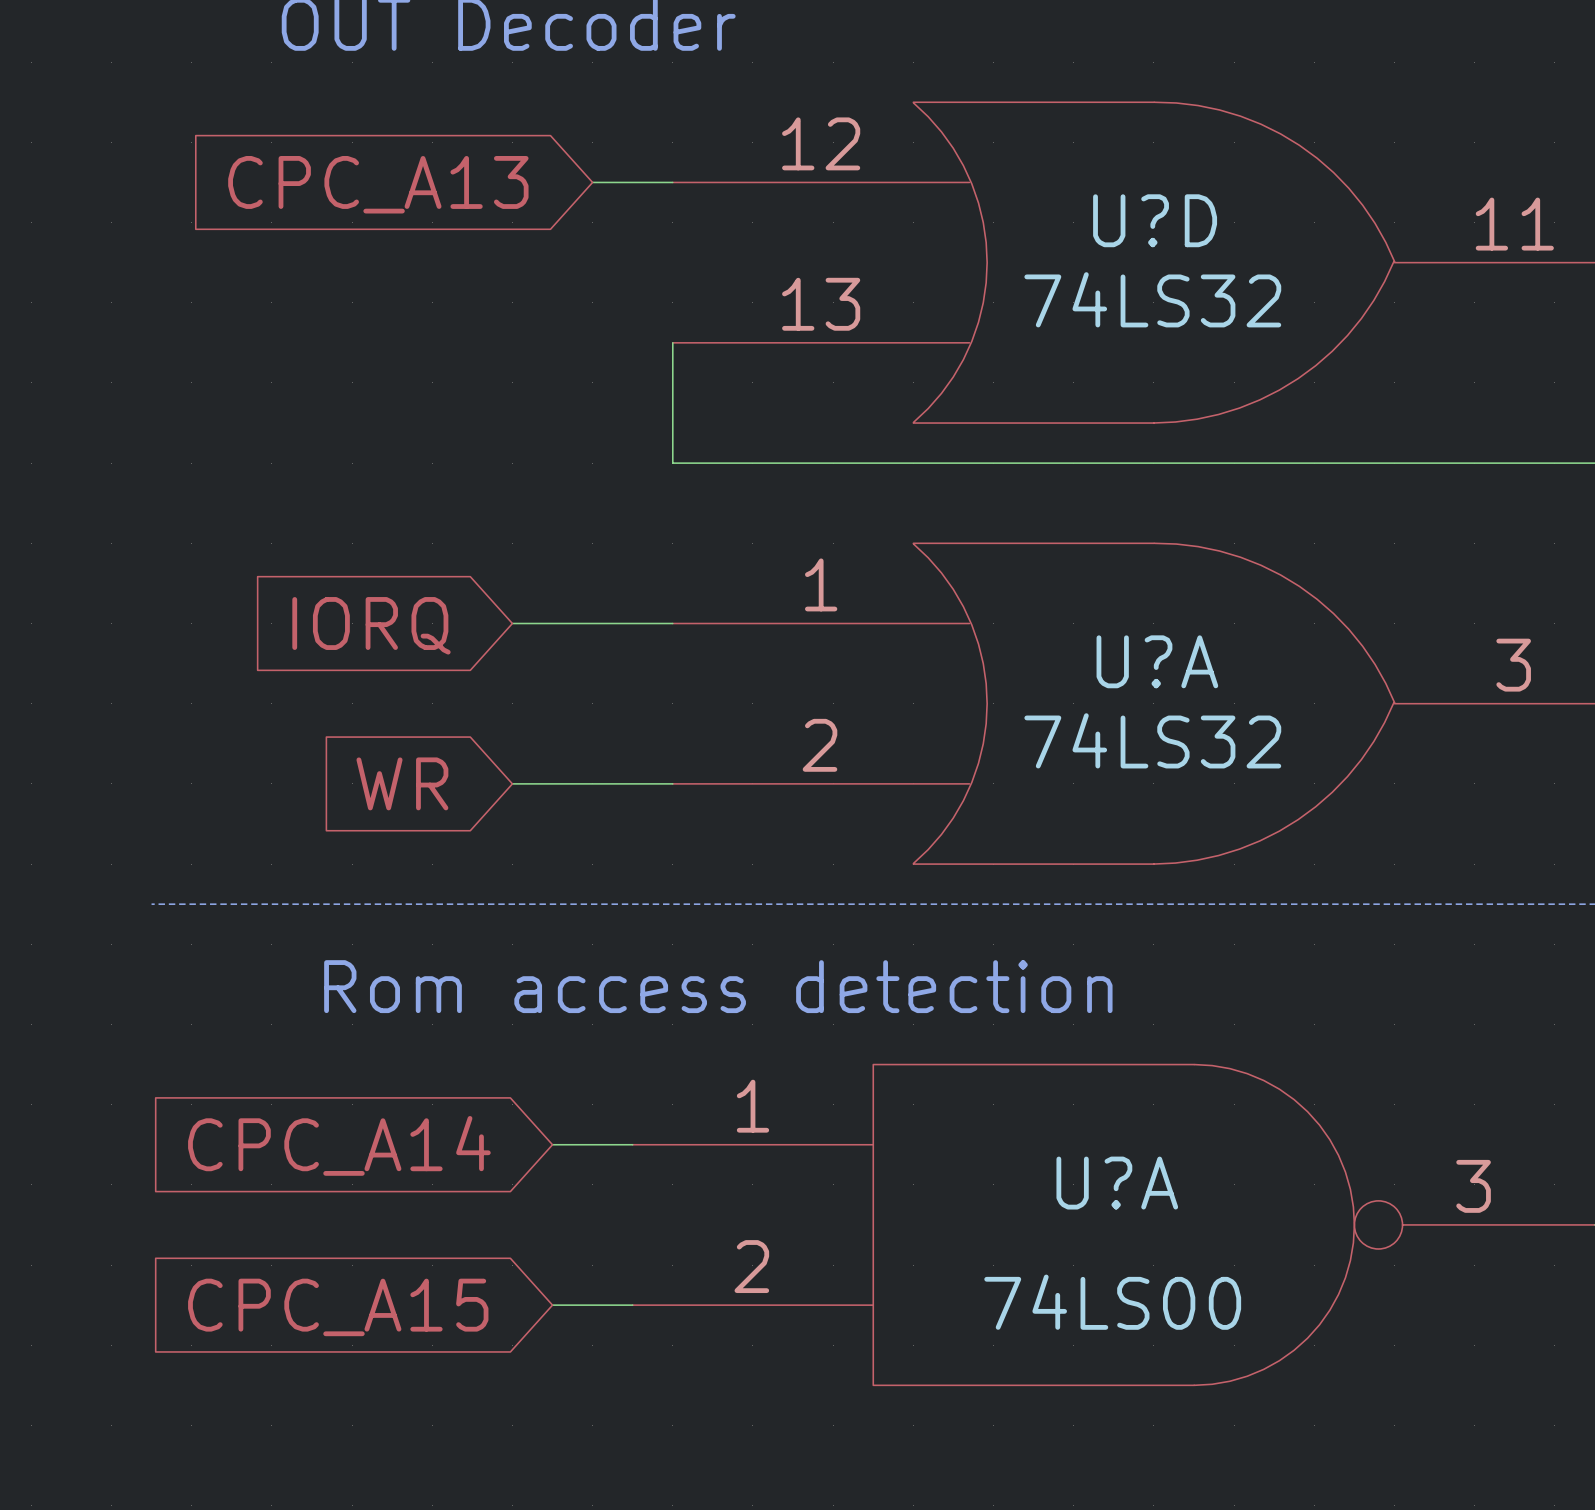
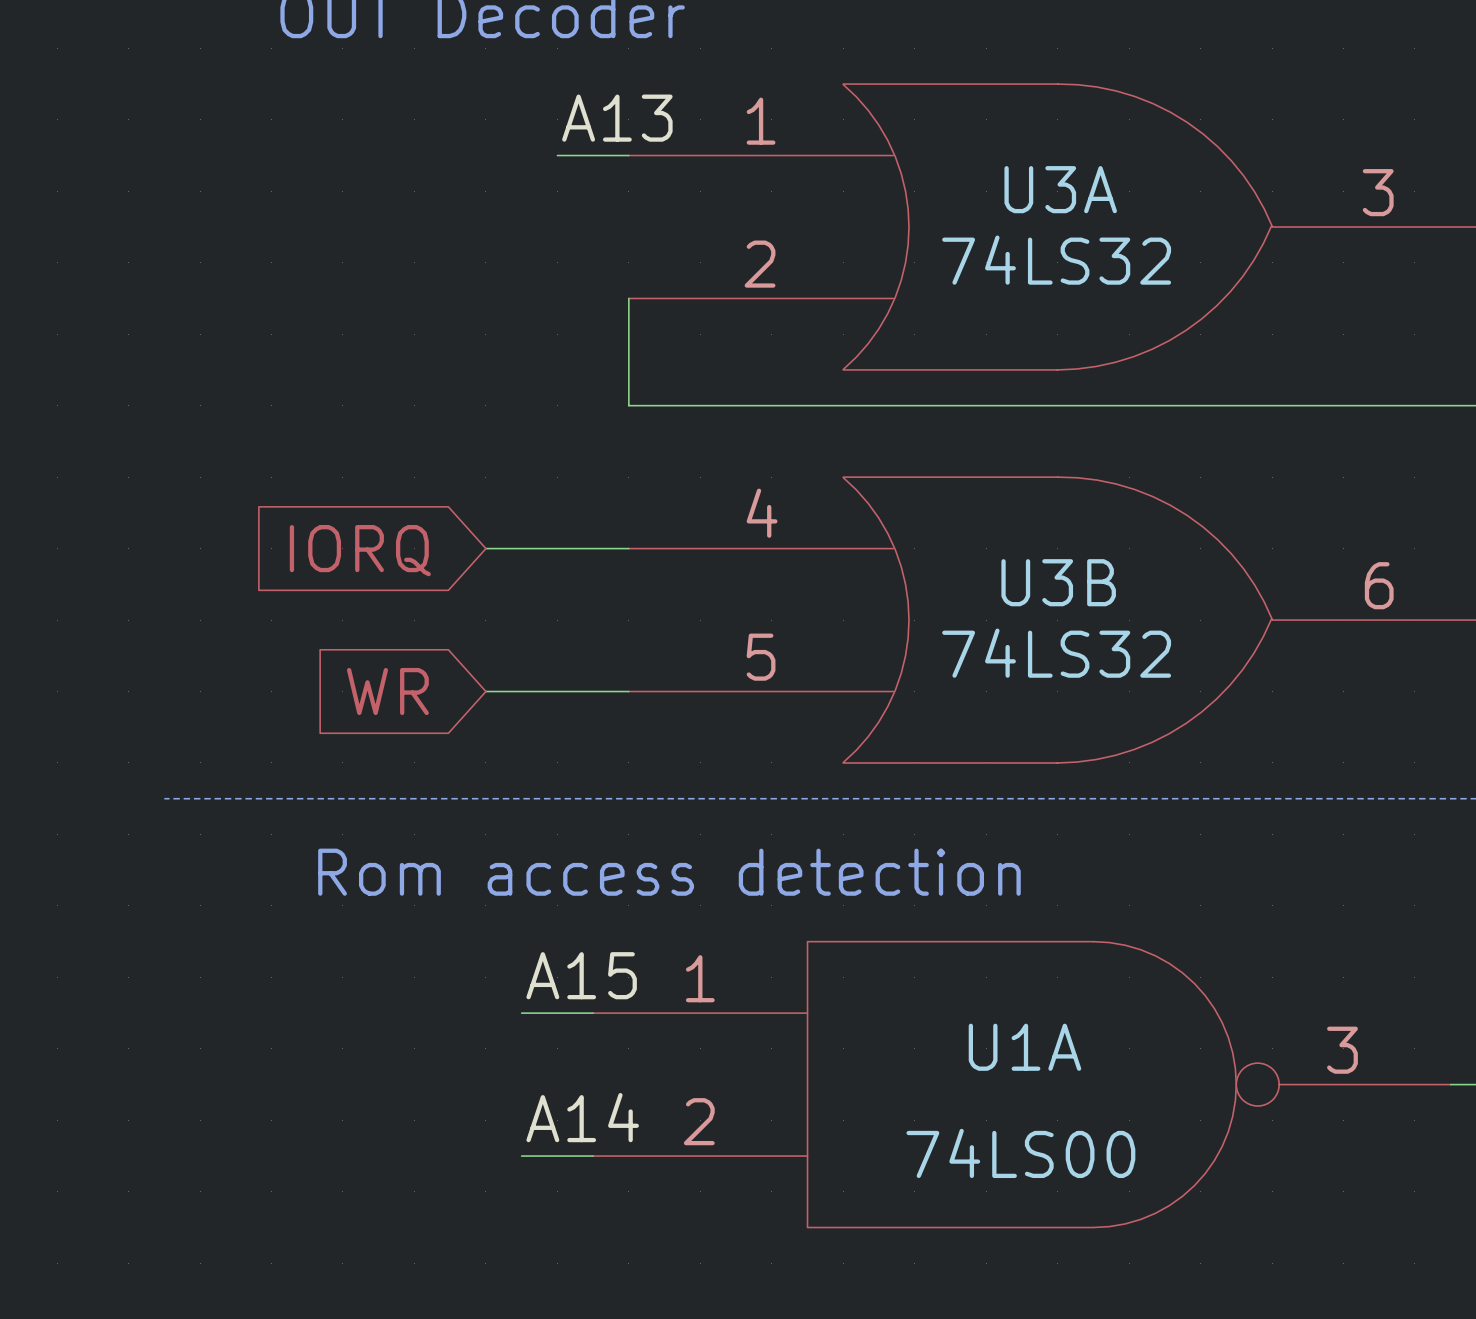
label: none -> A13 (617, 118)
U?D pin number: 12 (821, 143) -> 1 (761, 121)
global label: CPC_A13 (378, 184) -> none
U?D name: U?D (1155, 220) -> U3A (1060, 189)
U?D pin number: 11 (1514, 224) -> 3 (1378, 192)
U?D pin number: 13 (821, 304) -> 2 (760, 264)
U?A pin number: 1 (821, 584) -> 4 (762, 513)
U?A name: U?A (1157, 661) -> U3B (1058, 582)
U?A pin number: 3 (1513, 665) -> 6 (1379, 585)
U?A pin number: 2 (820, 745) -> 5 (761, 657)
label: none -> A15 (581, 975)
global label: CPC_A14 (339, 1145) -> none
U?A name: U?A (1117, 1183) -> U1A (1024, 1047)
label: none -> A14 (582, 1117)
global label: CPC_A15 (338, 1307) -> none

